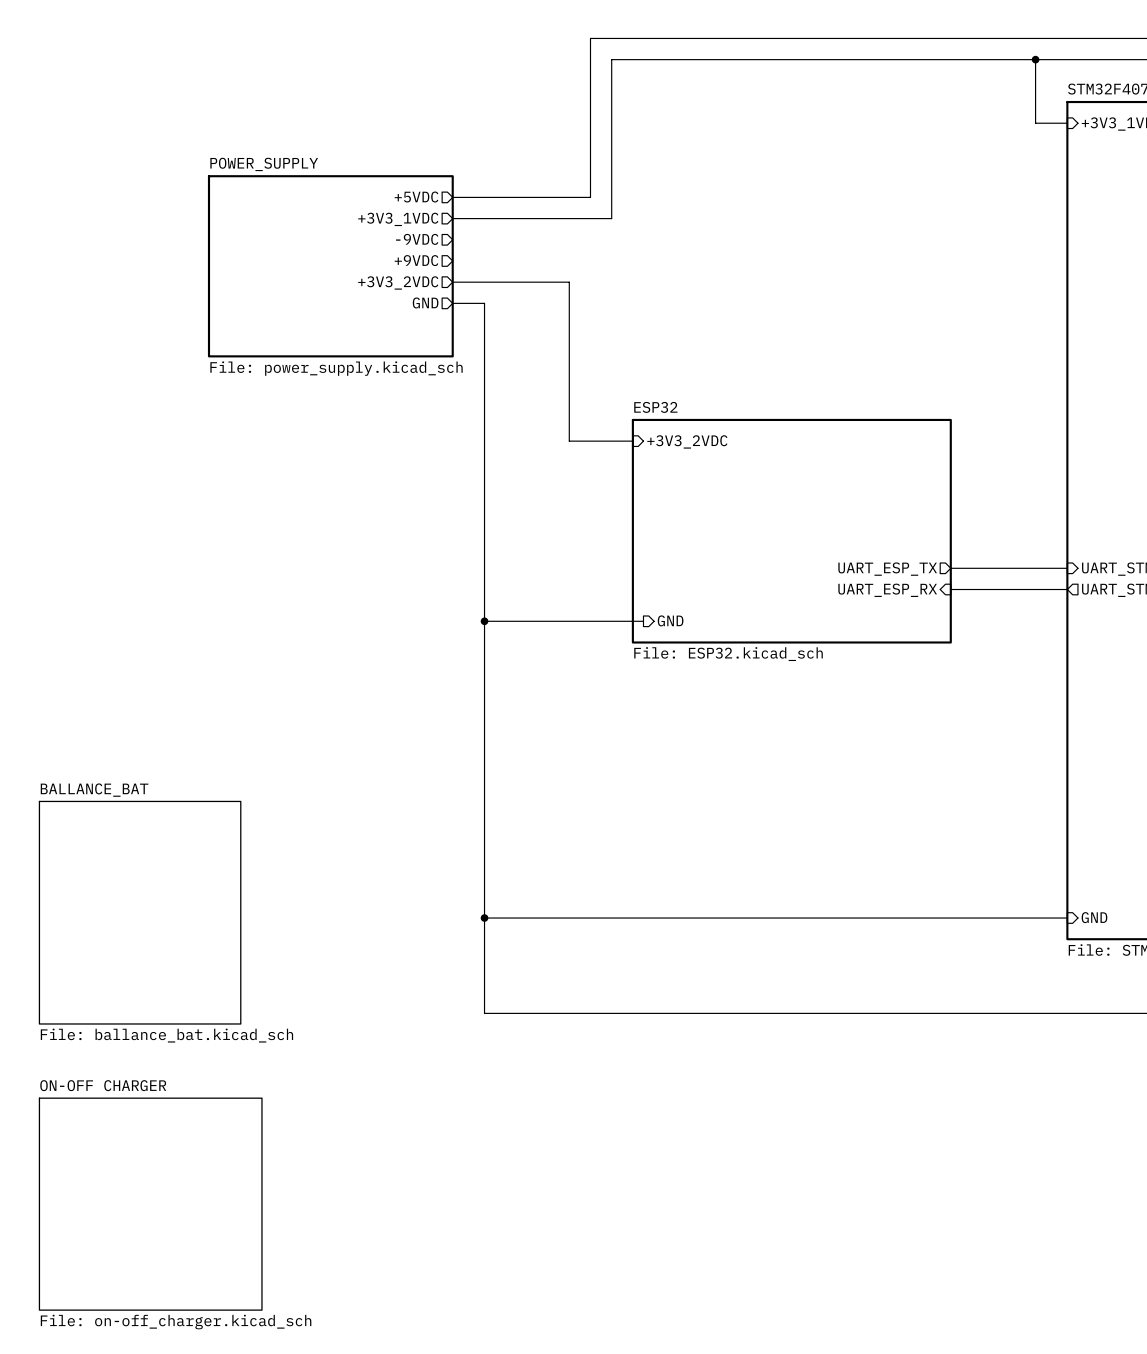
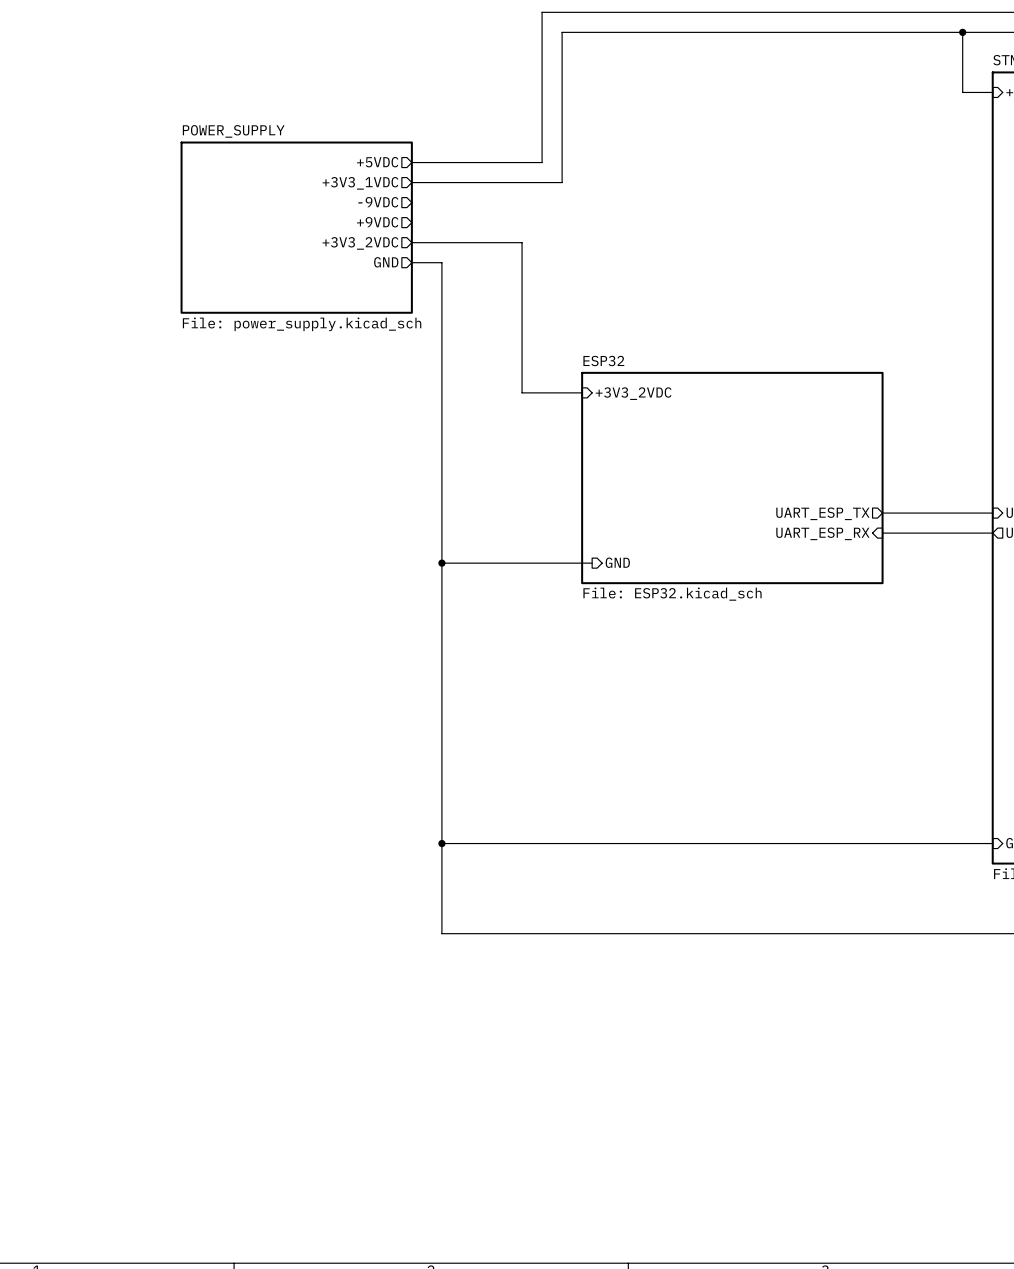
sheet BALLANCE_BAT: File: ballance_bat.kicad_sch (140, 912) -> none
sheet ON-OFF CHARGER: File: on-off_charger.kicad_sch (150, 1204) -> none

